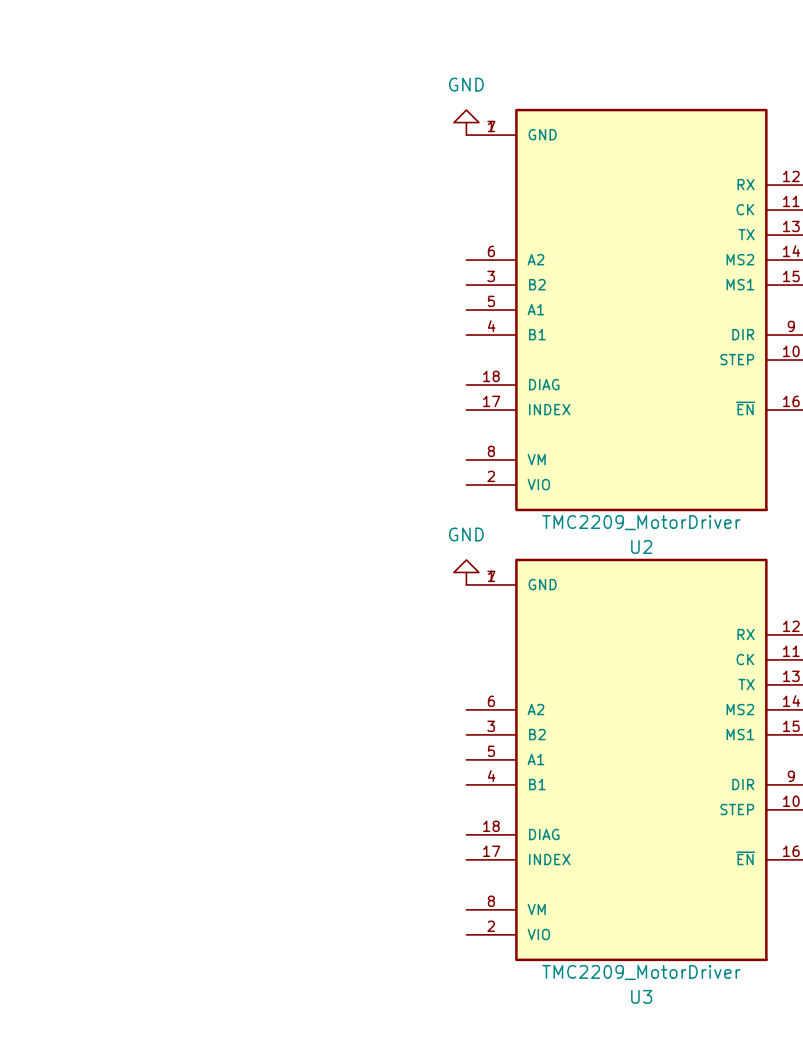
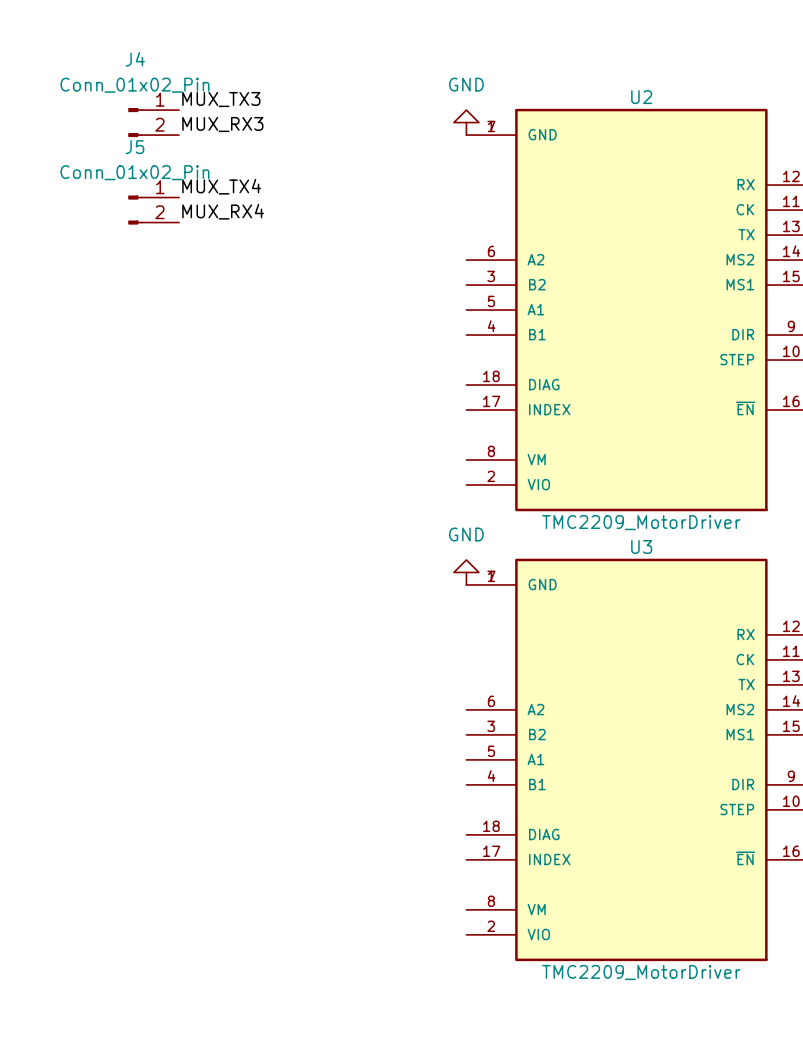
label: none -> MUX_TX3 (221, 99)
J4: none -> Conn_01x02_Pin (153, 122)
label: none -> MUX_RX3 (222, 124)
label: none -> MUX_TX4 (221, 186)
J5: none -> Conn_01x02_Pin (153, 210)
label: none -> MUX_RX4 (223, 211)
U2 name position: U2 (641, 547) -> U2 (641, 97)
U3 name position: U3 (641, 996) -> U3 (641, 547)

